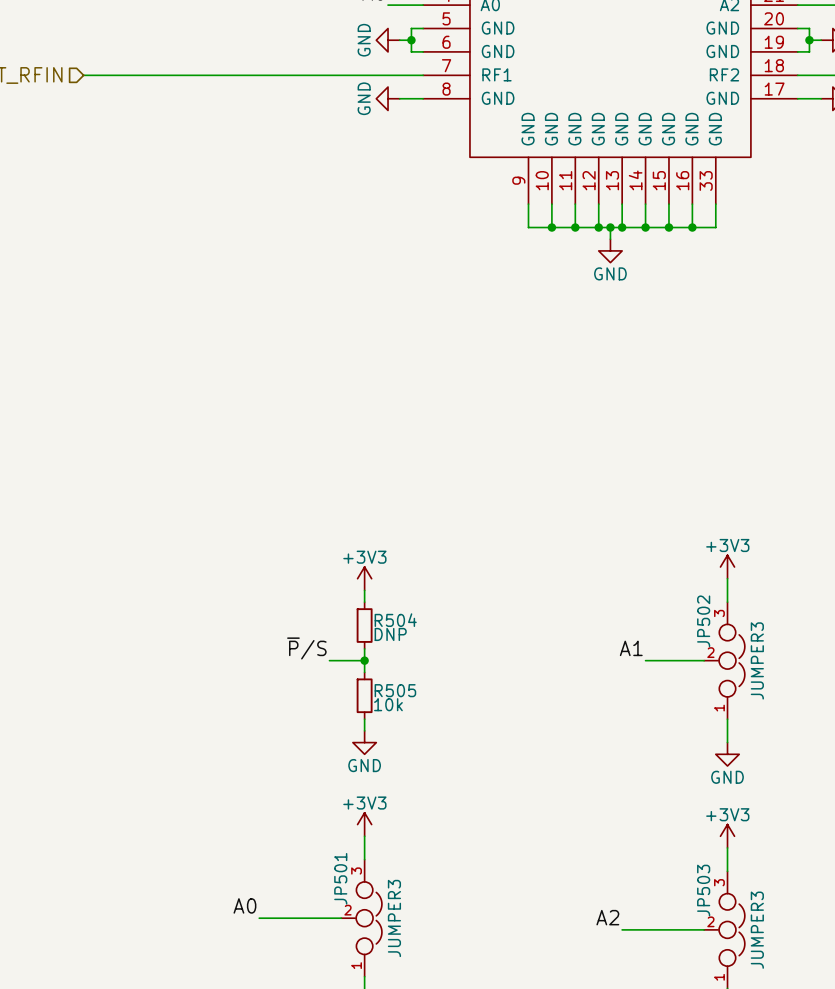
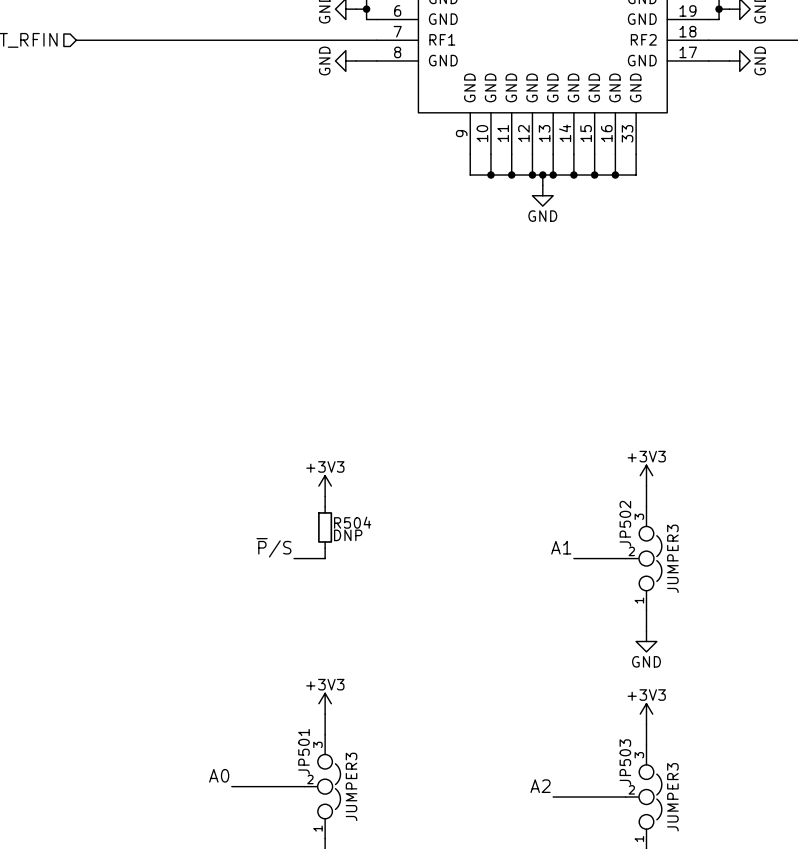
wire: (364, 660) (364, 672) -> none
junction: (364, 660) -> none
R505: 10k (364, 695) -> none
wire: (364, 719) (364, 730) -> none
power symbol: GND (364, 742) -> none

